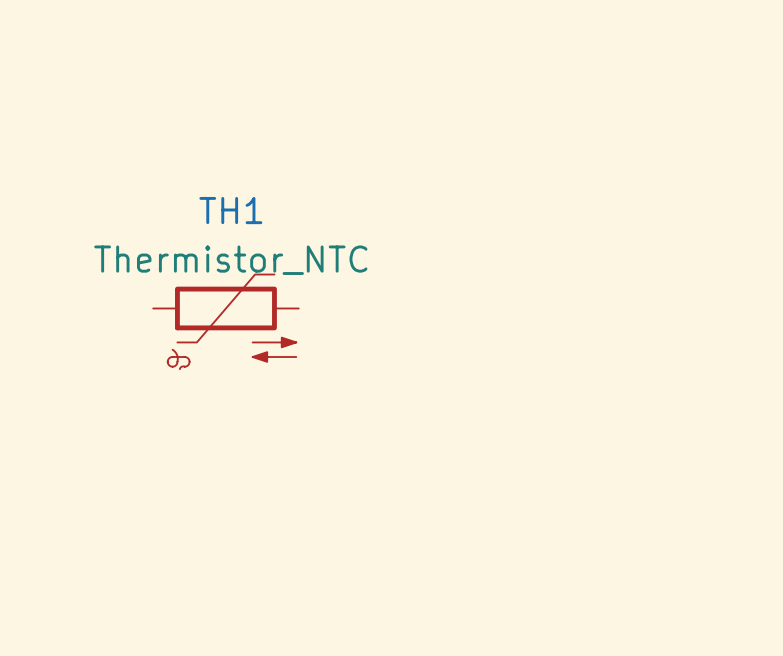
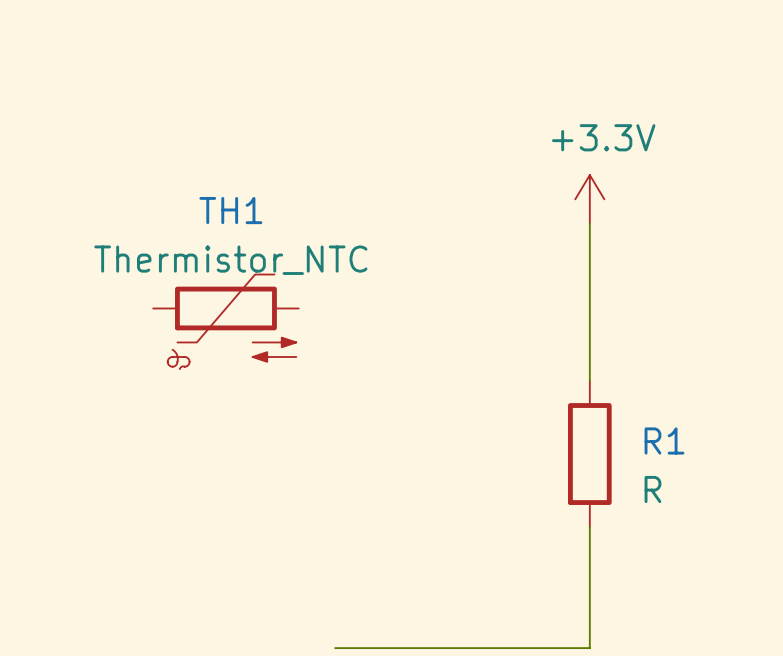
power symbol: none -> +3.3V (589, 199)
wire: none -> (589, 223) (589, 381)
R1: none -> R (589, 454)
wire: none -> (589, 526) (589, 648) (335, 648)

